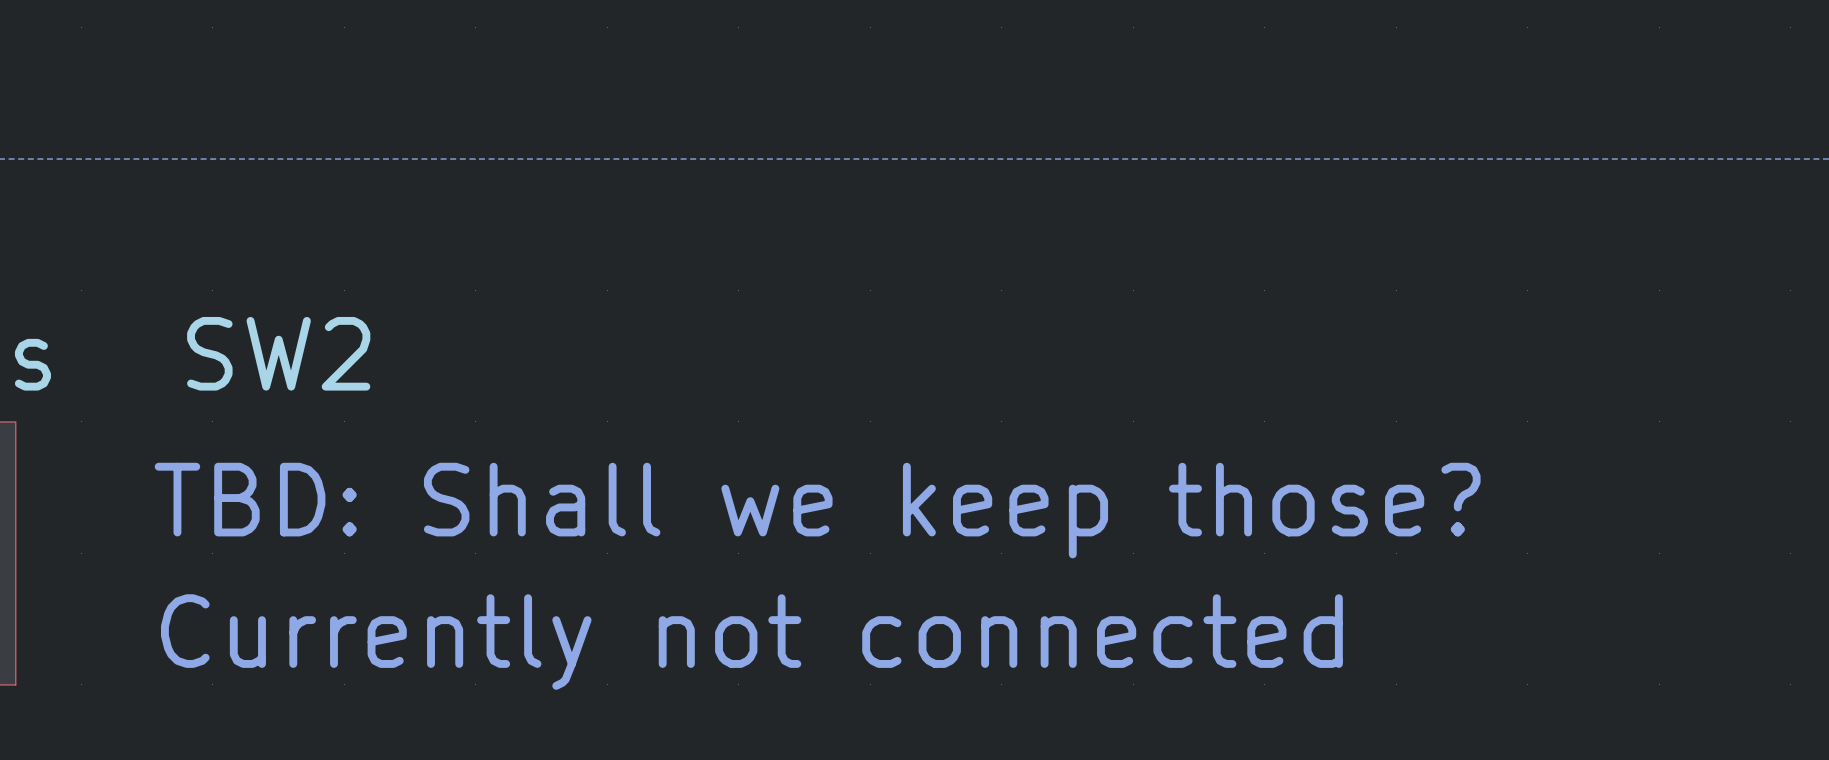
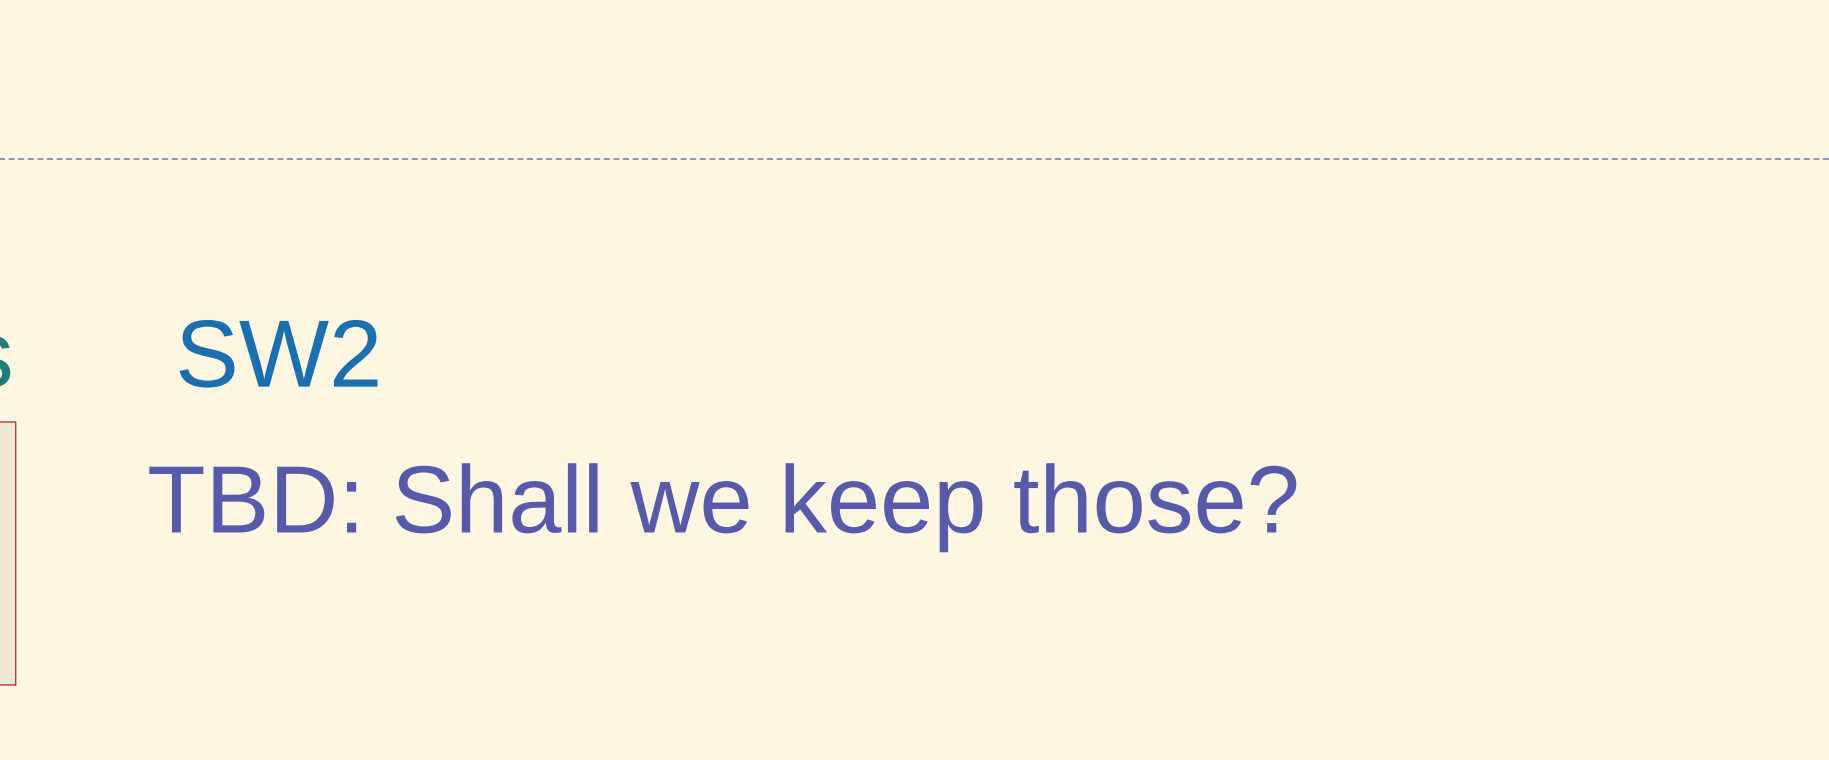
text: Currently not connected (751, 642) -> none

